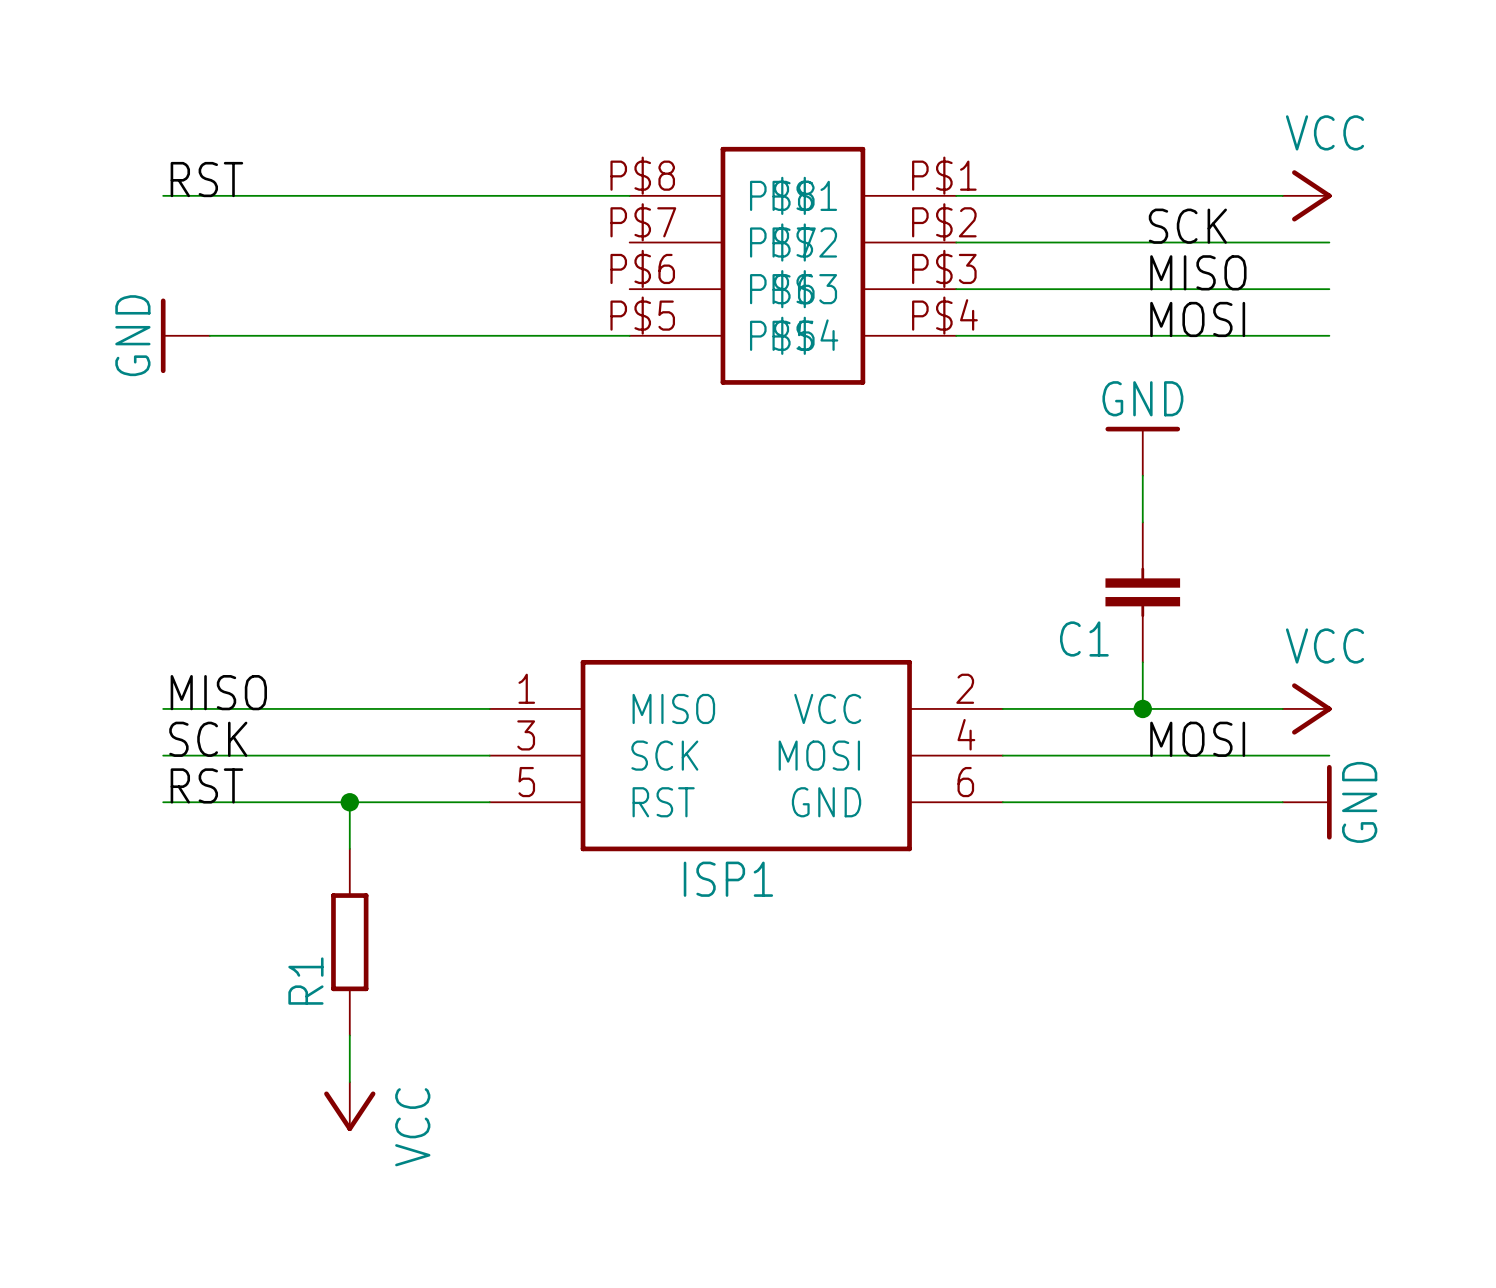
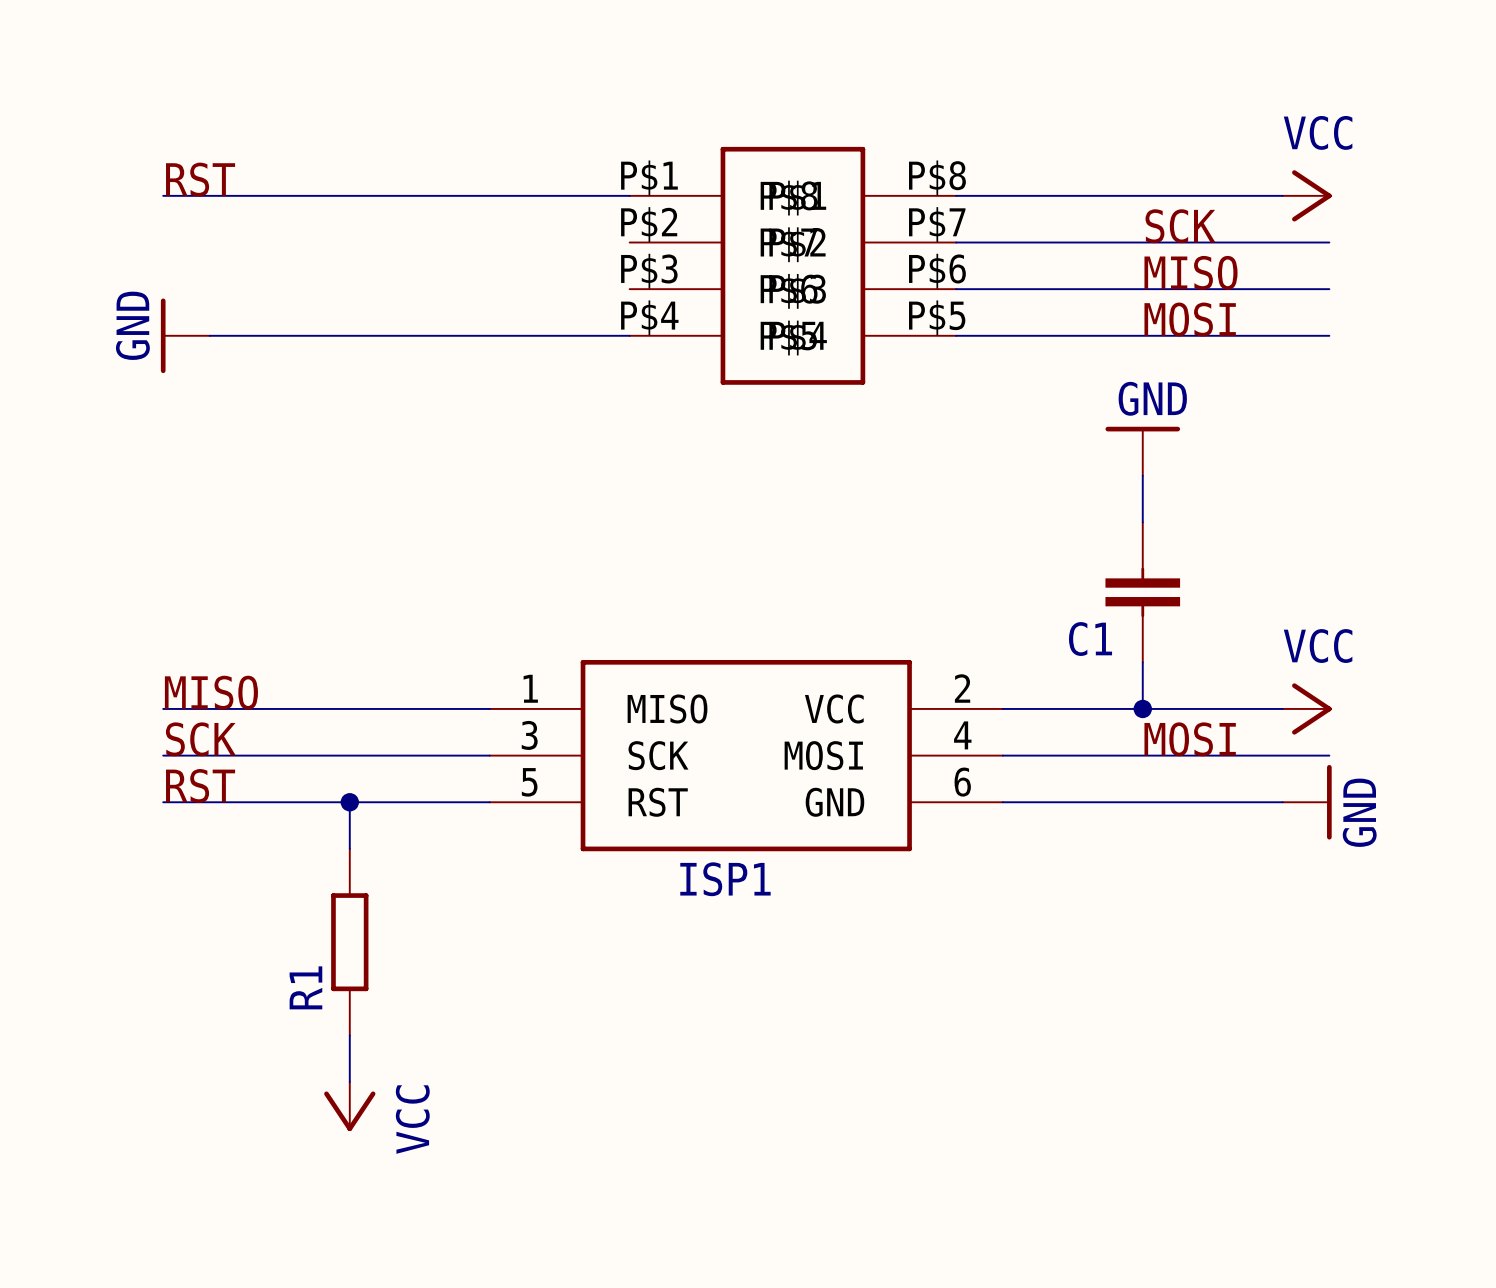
part pin number: P$8 (642, 175) -> P$1 (649, 177)
part pin number: P$1 (944, 175) -> P$8 (937, 177)
part pin number: P$7 (643, 222) -> P$2 (649, 224)
part pin number: P$2 (944, 222) -> P$7 (937, 224)
part pin number: P$6 (642, 268) -> P$3 (649, 271)
part pin number: P$3 (944, 268) -> P$6 (937, 271)
part pin number: P$5 (642, 315) -> P$4 (649, 317)
part pin number: P$4 (944, 315) -> P$5 (937, 317)

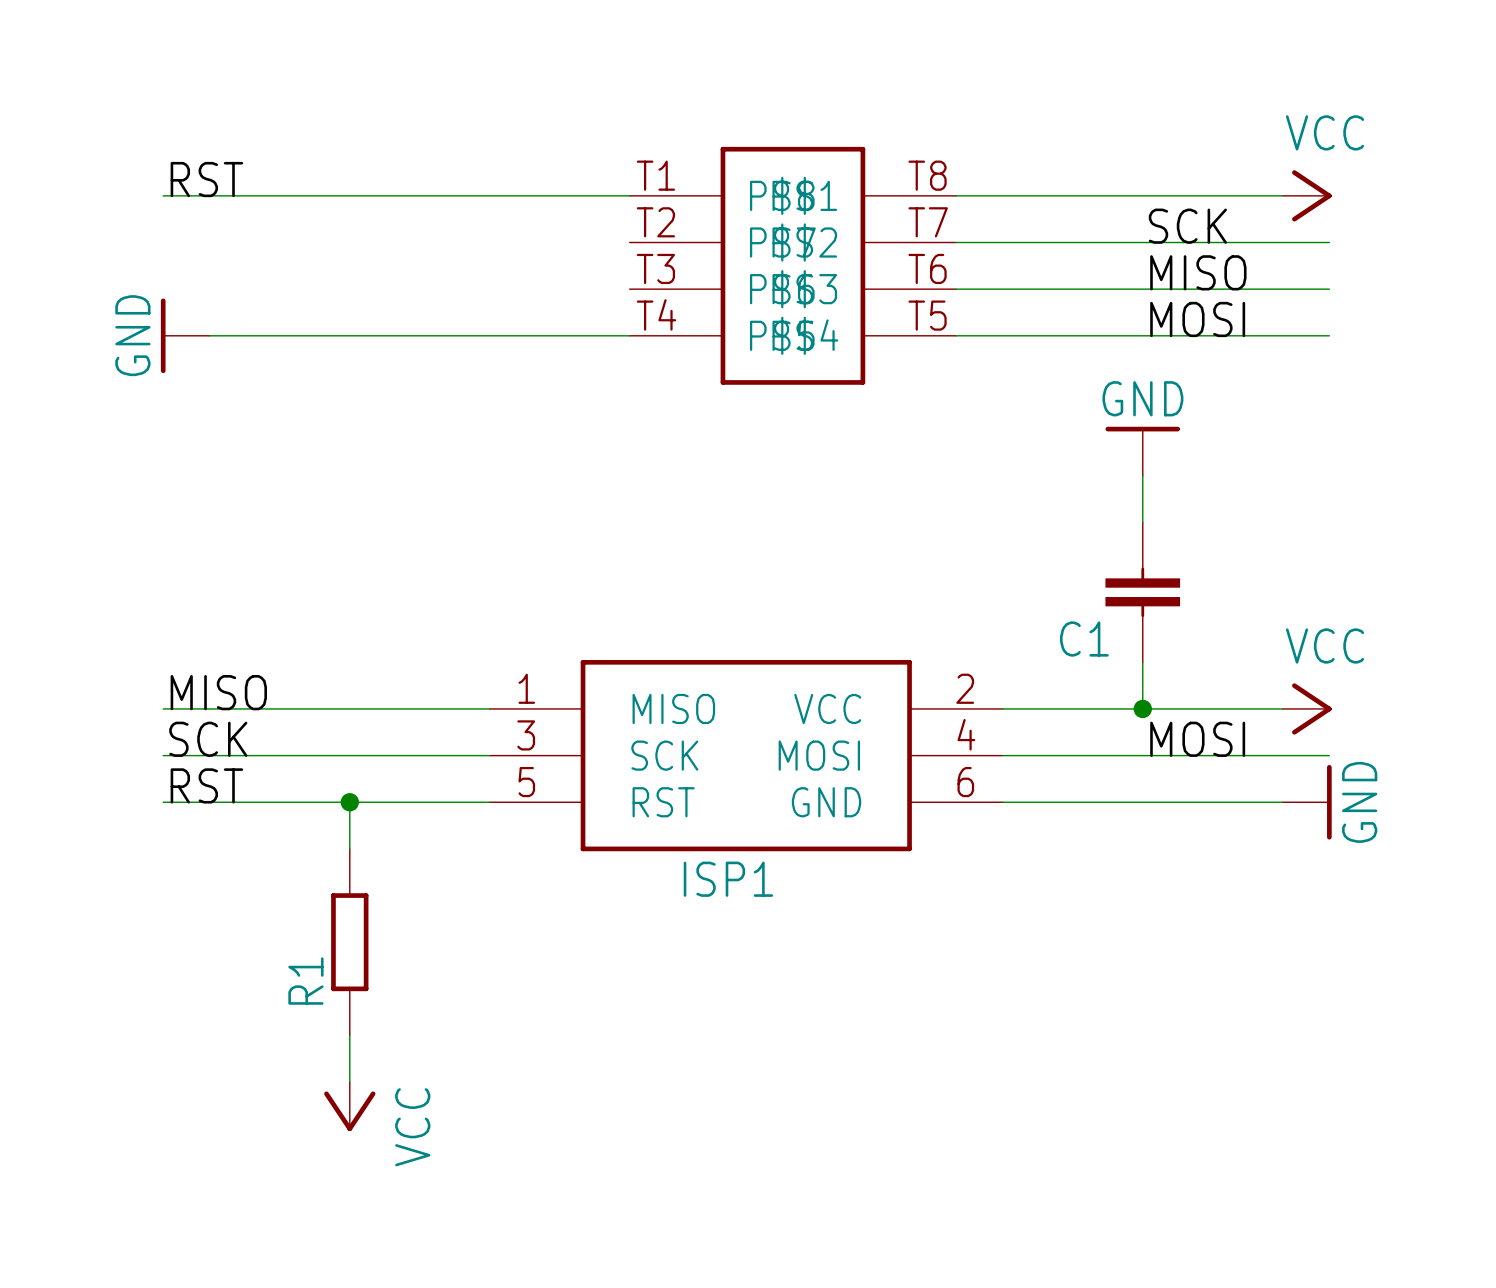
part pin number: P$1 (649, 177) -> T1 (655, 175)
part pin number: P$8 (937, 177) -> T8 (927, 175)
part pin number: P$2 (649, 224) -> T2 (655, 222)
part pin number: P$7 (937, 224) -> T7 (928, 222)
part pin number: P$3 (649, 271) -> T3 (655, 268)
part pin number: P$6 (937, 271) -> T6 (927, 268)
part pin number: P$4 (649, 317) -> T4 (656, 314)
part pin number: P$5 (937, 317) -> T5 (927, 315)

